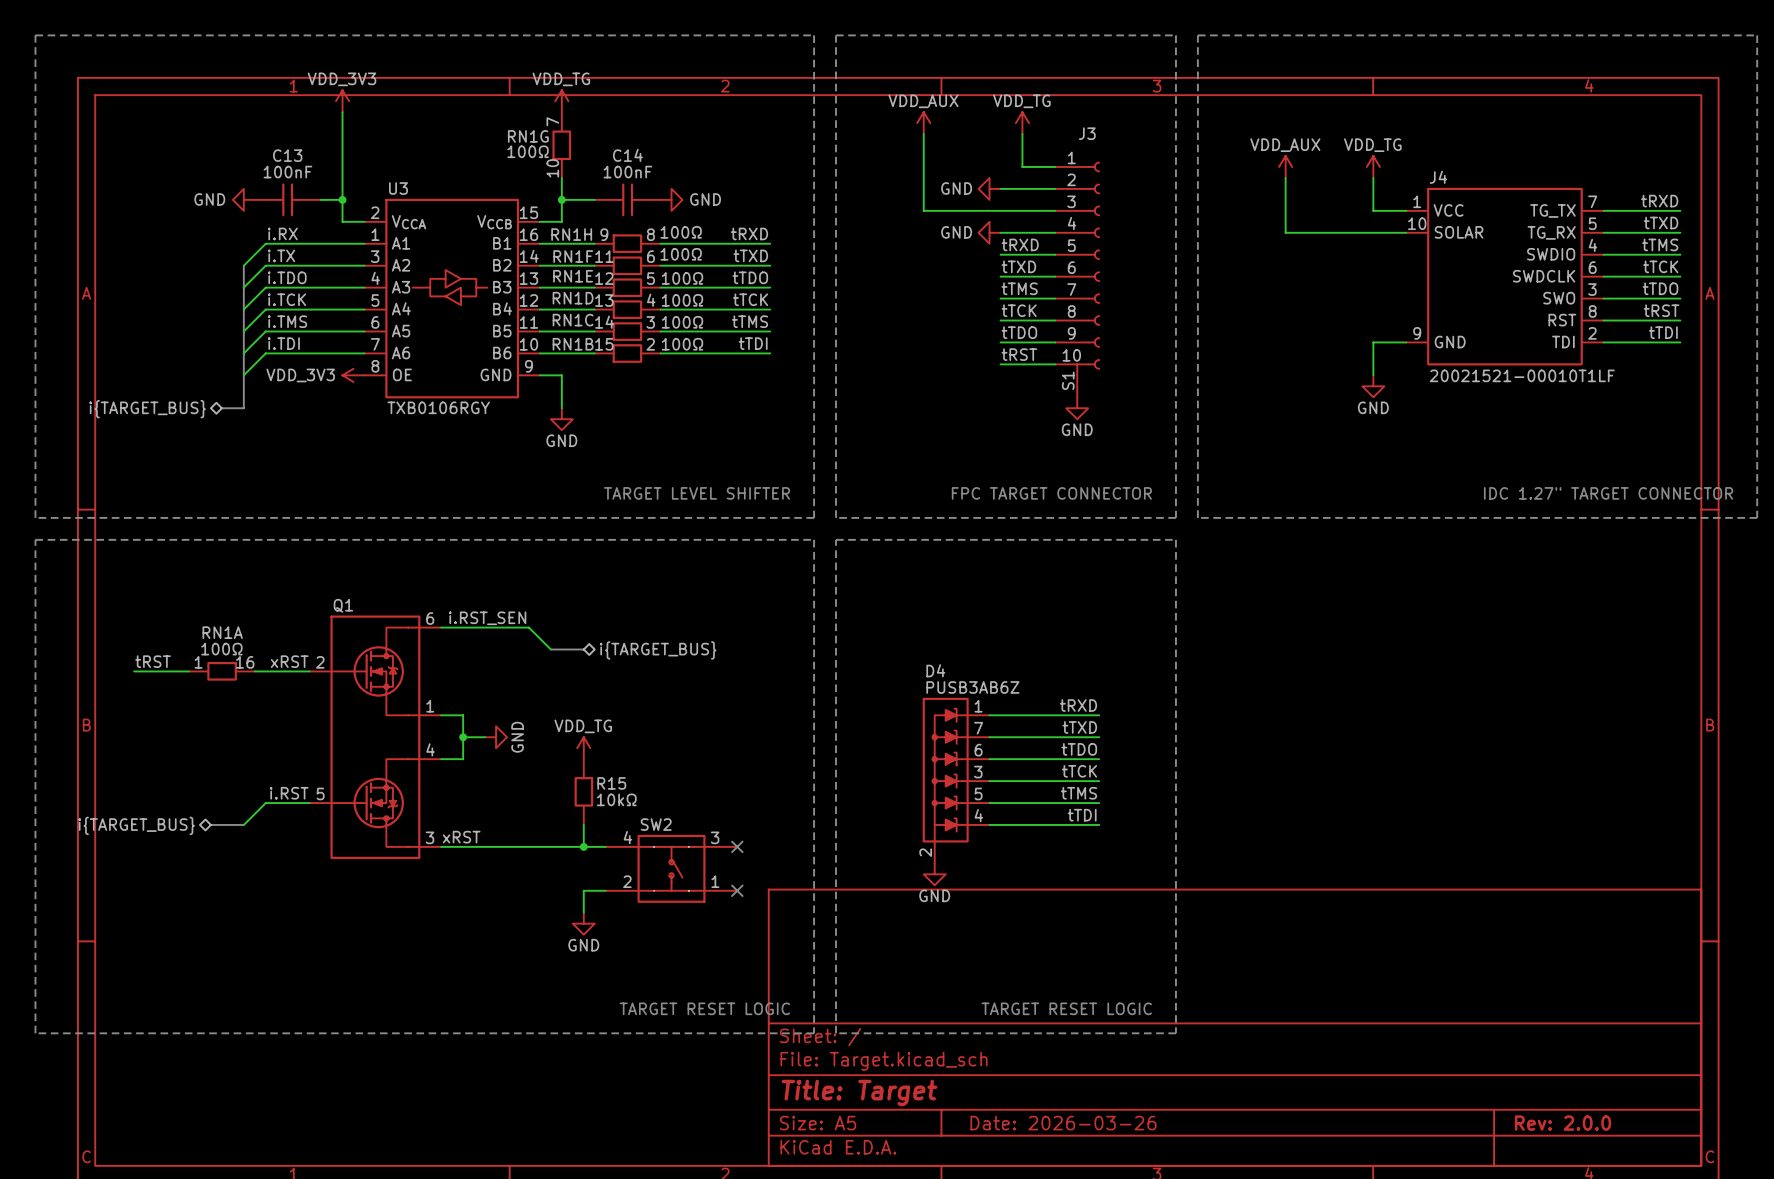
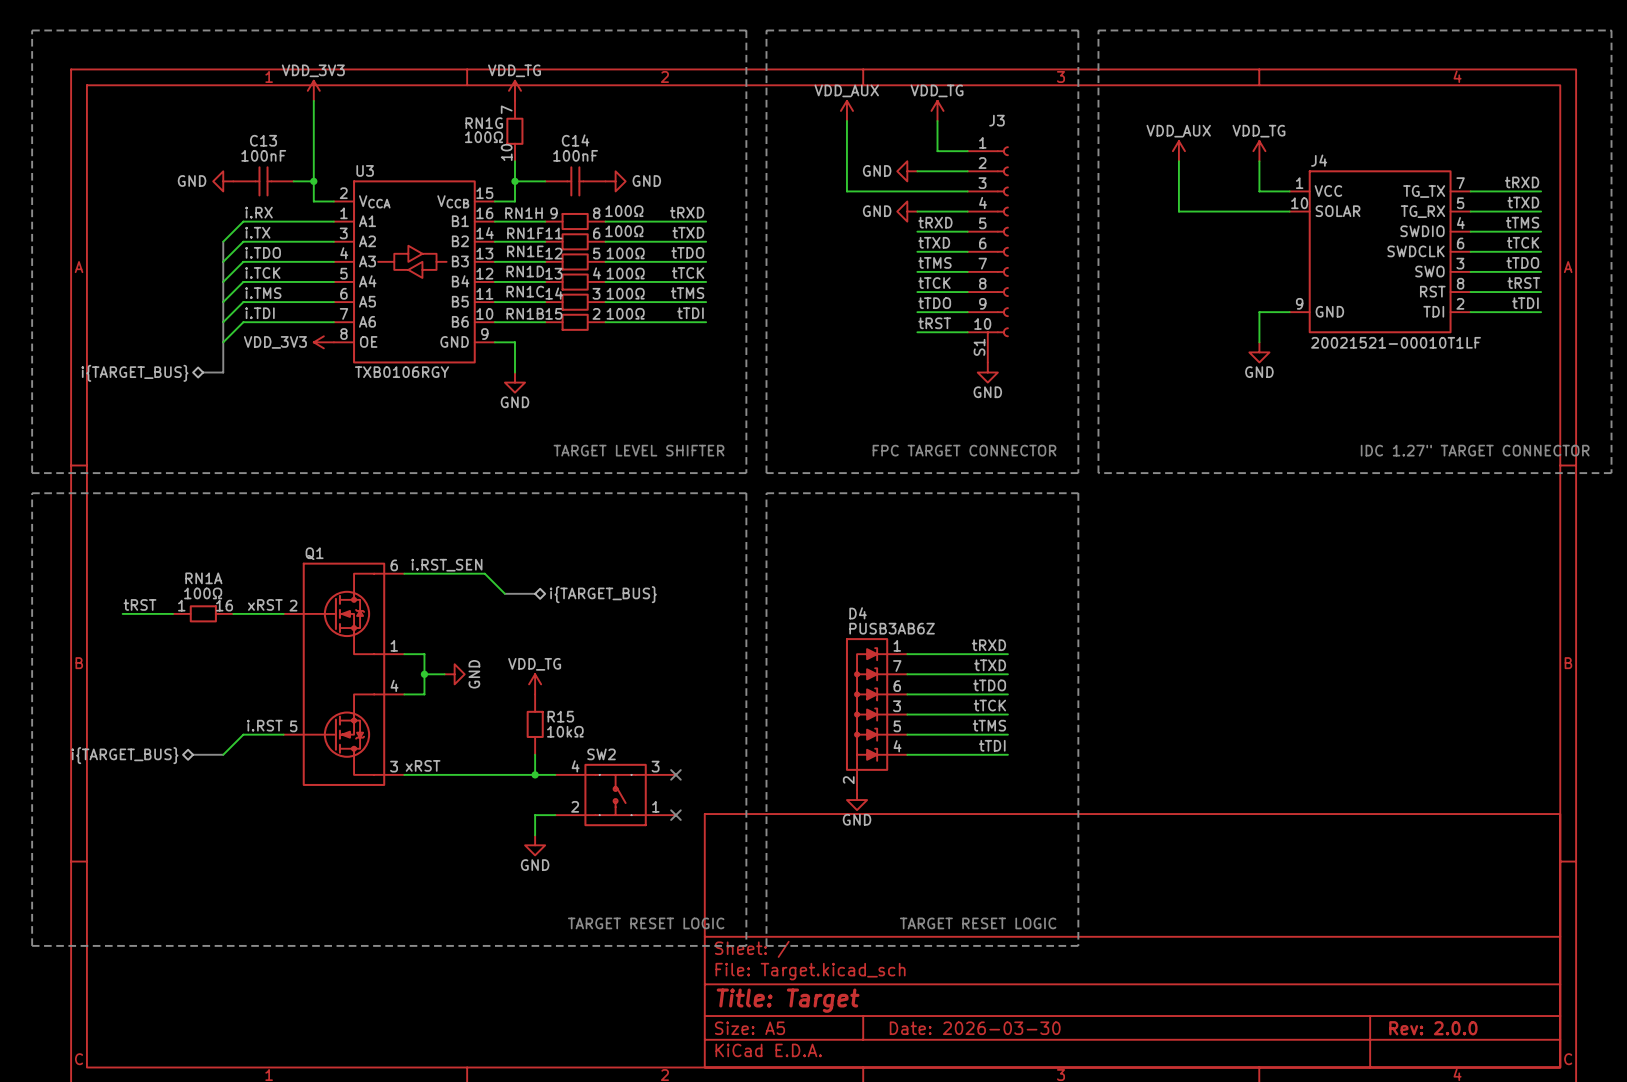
title block: Date: 2026-03-26 (1063, 1123) -> Date: 2026-03-30 (975, 1028)

